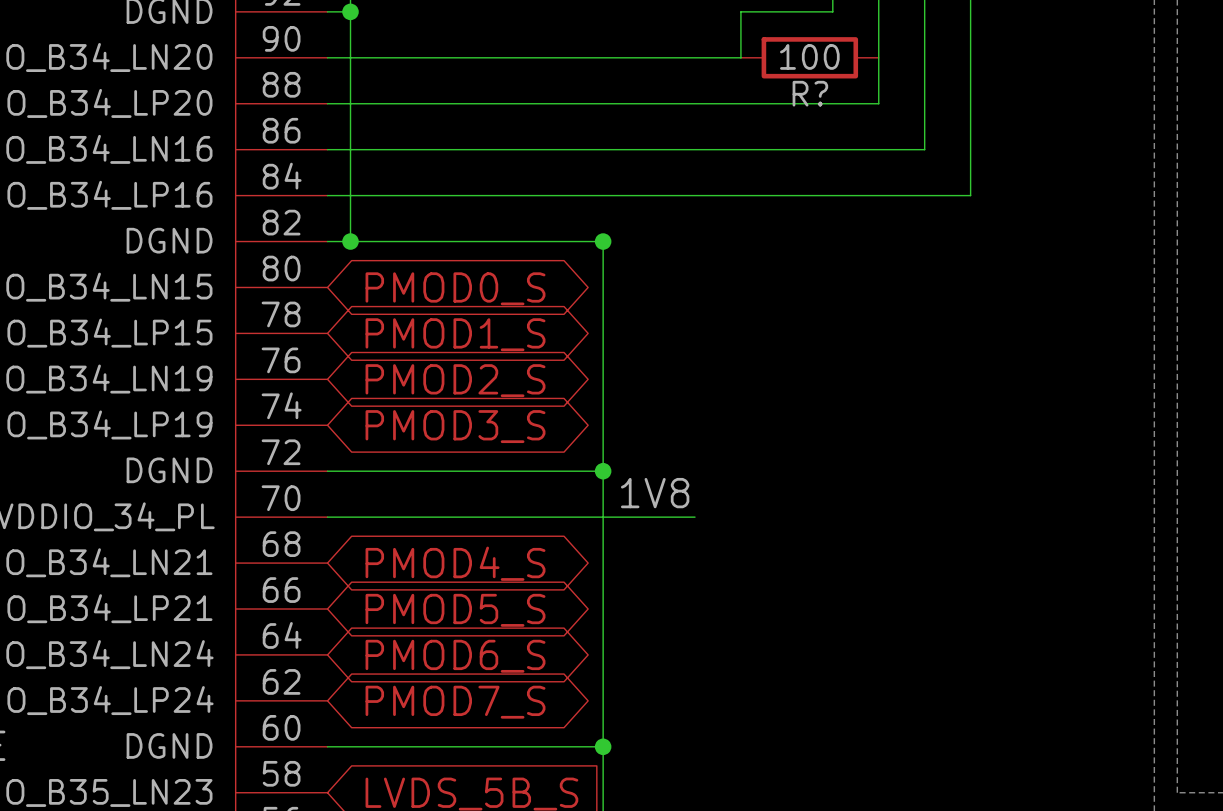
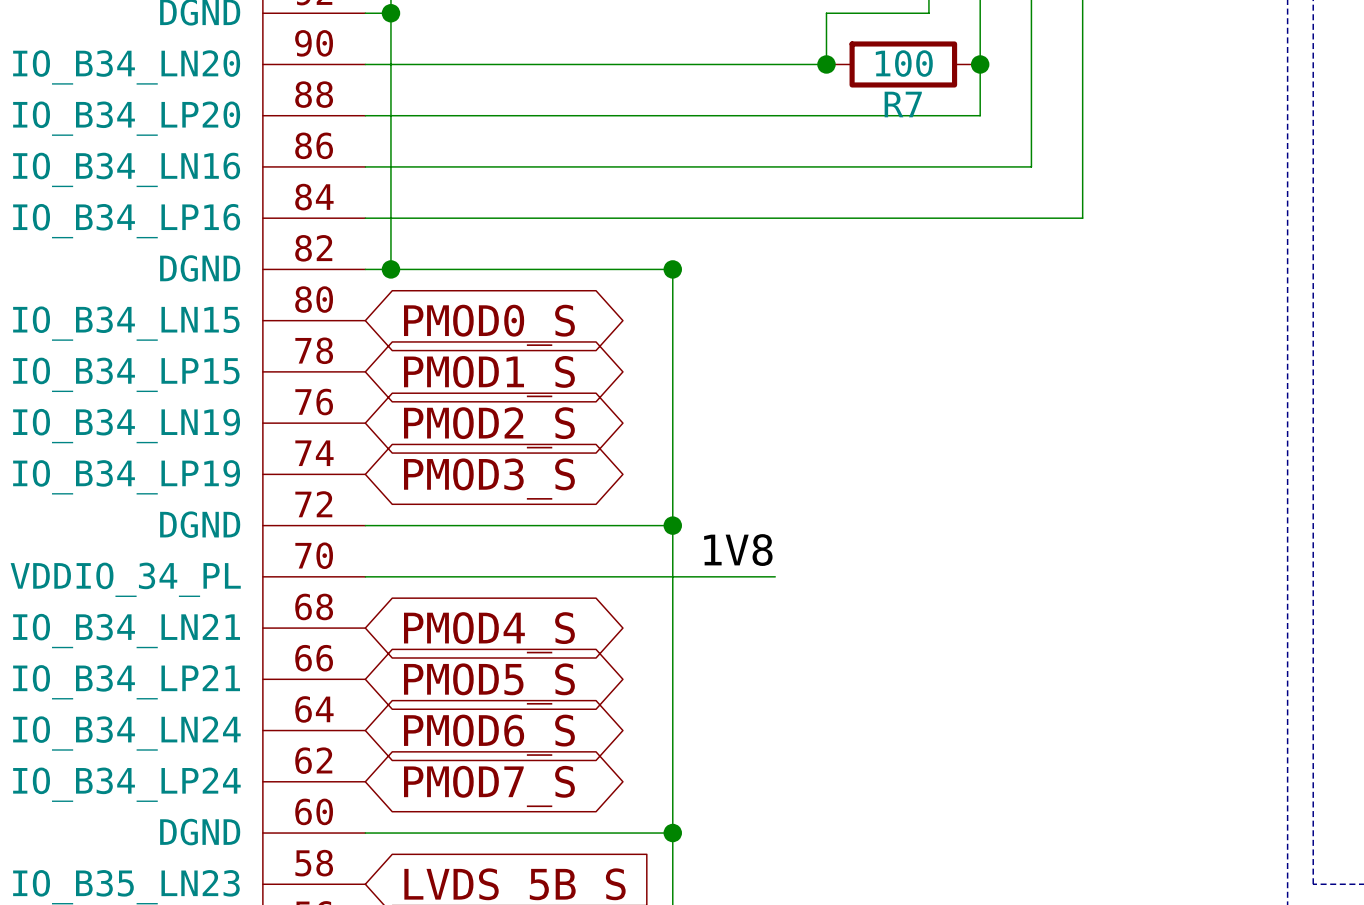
junction: none -> (826, 64)
junction: none -> (980, 64)
R? name: R? (810, 93) -> R7 (903, 104)

